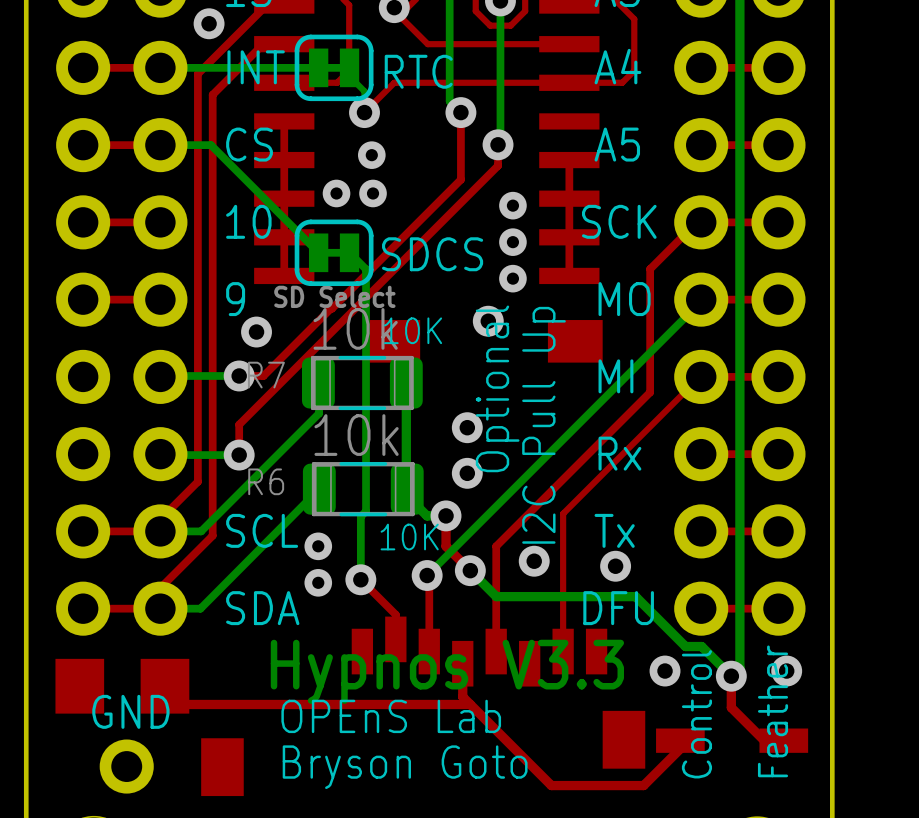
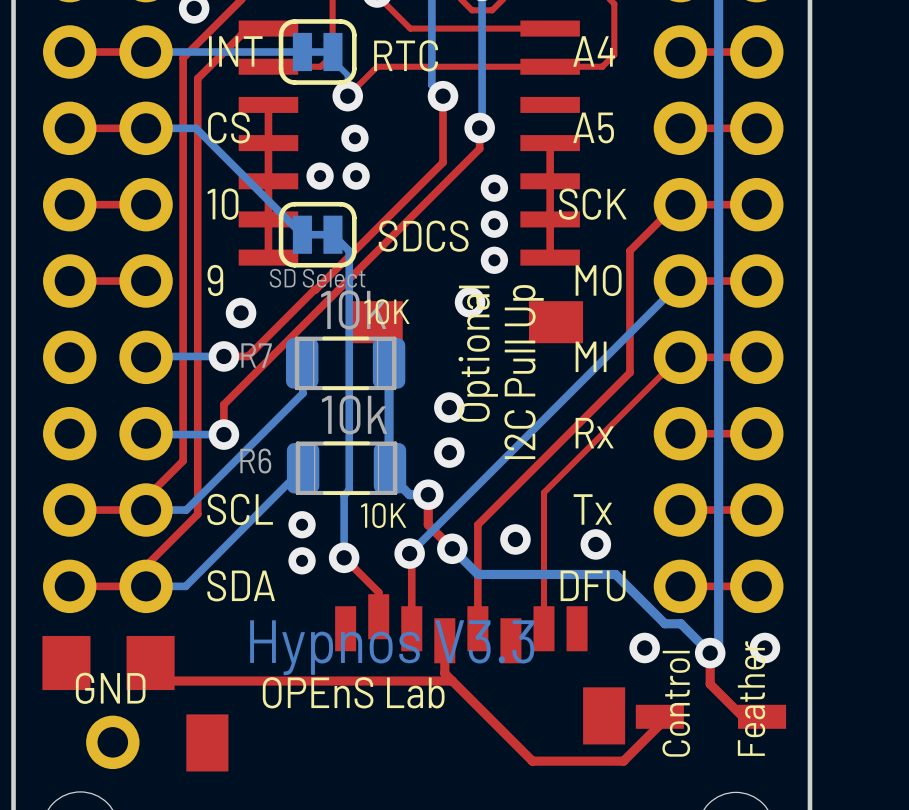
text: Bryson Goto (405, 767) -> none

